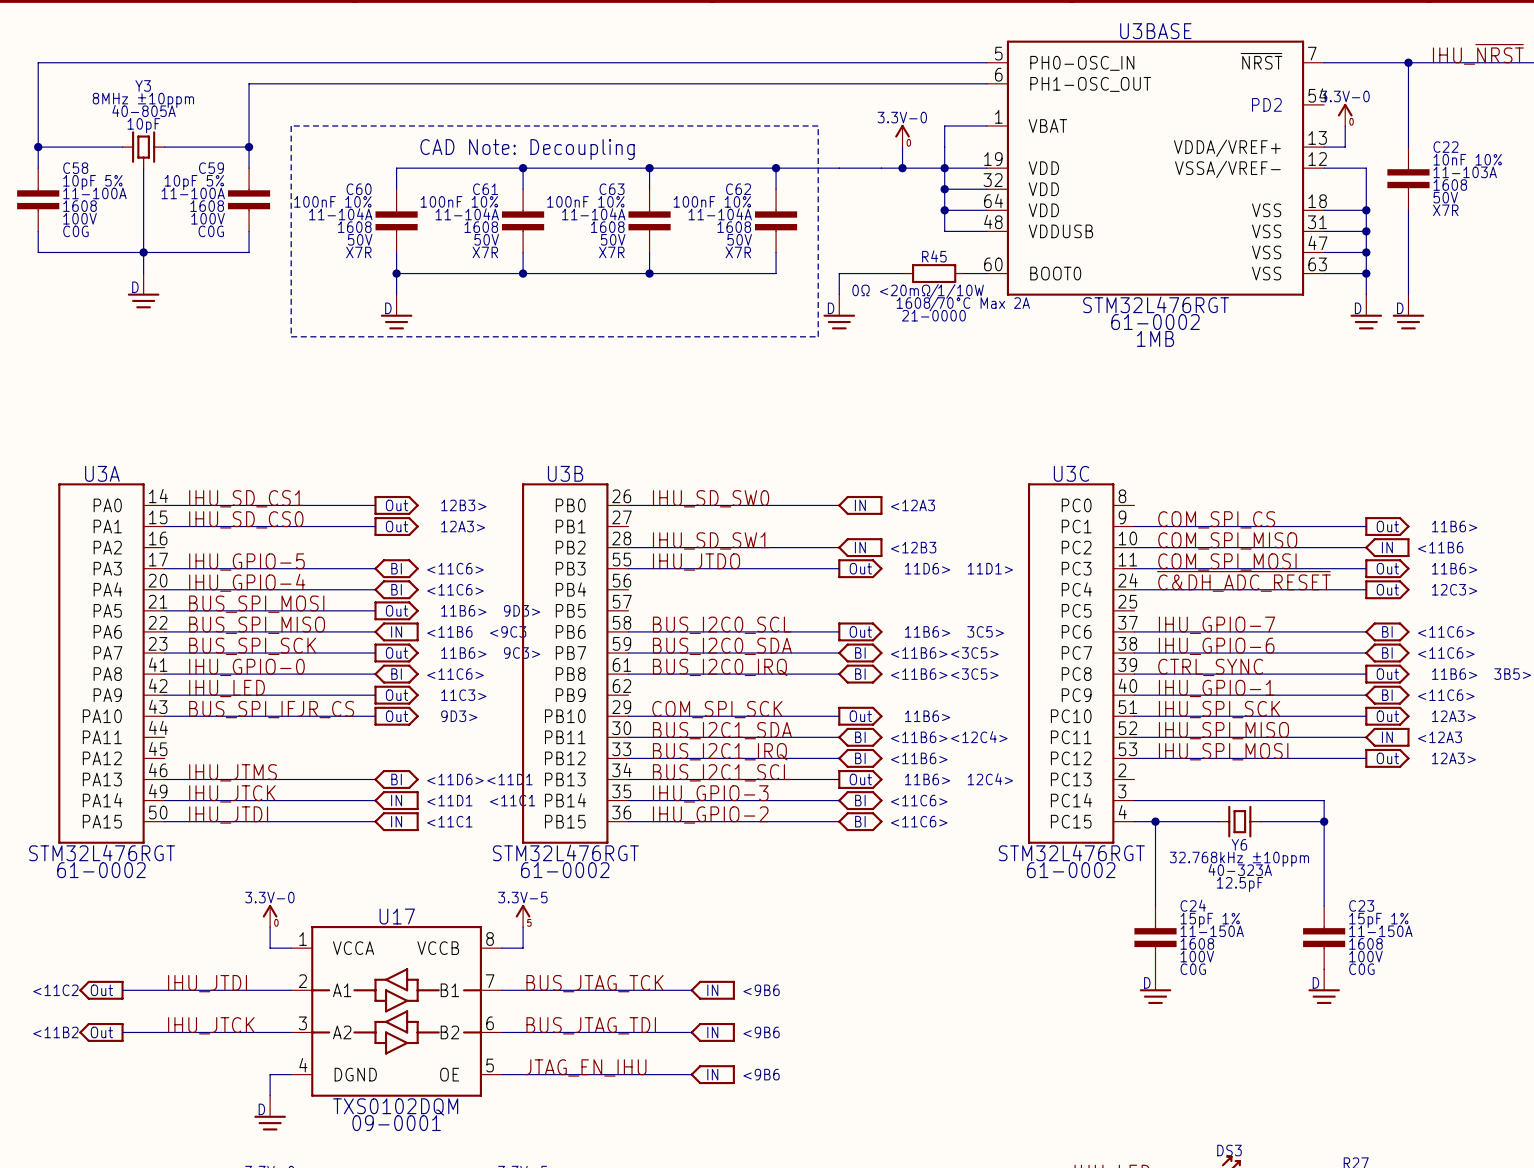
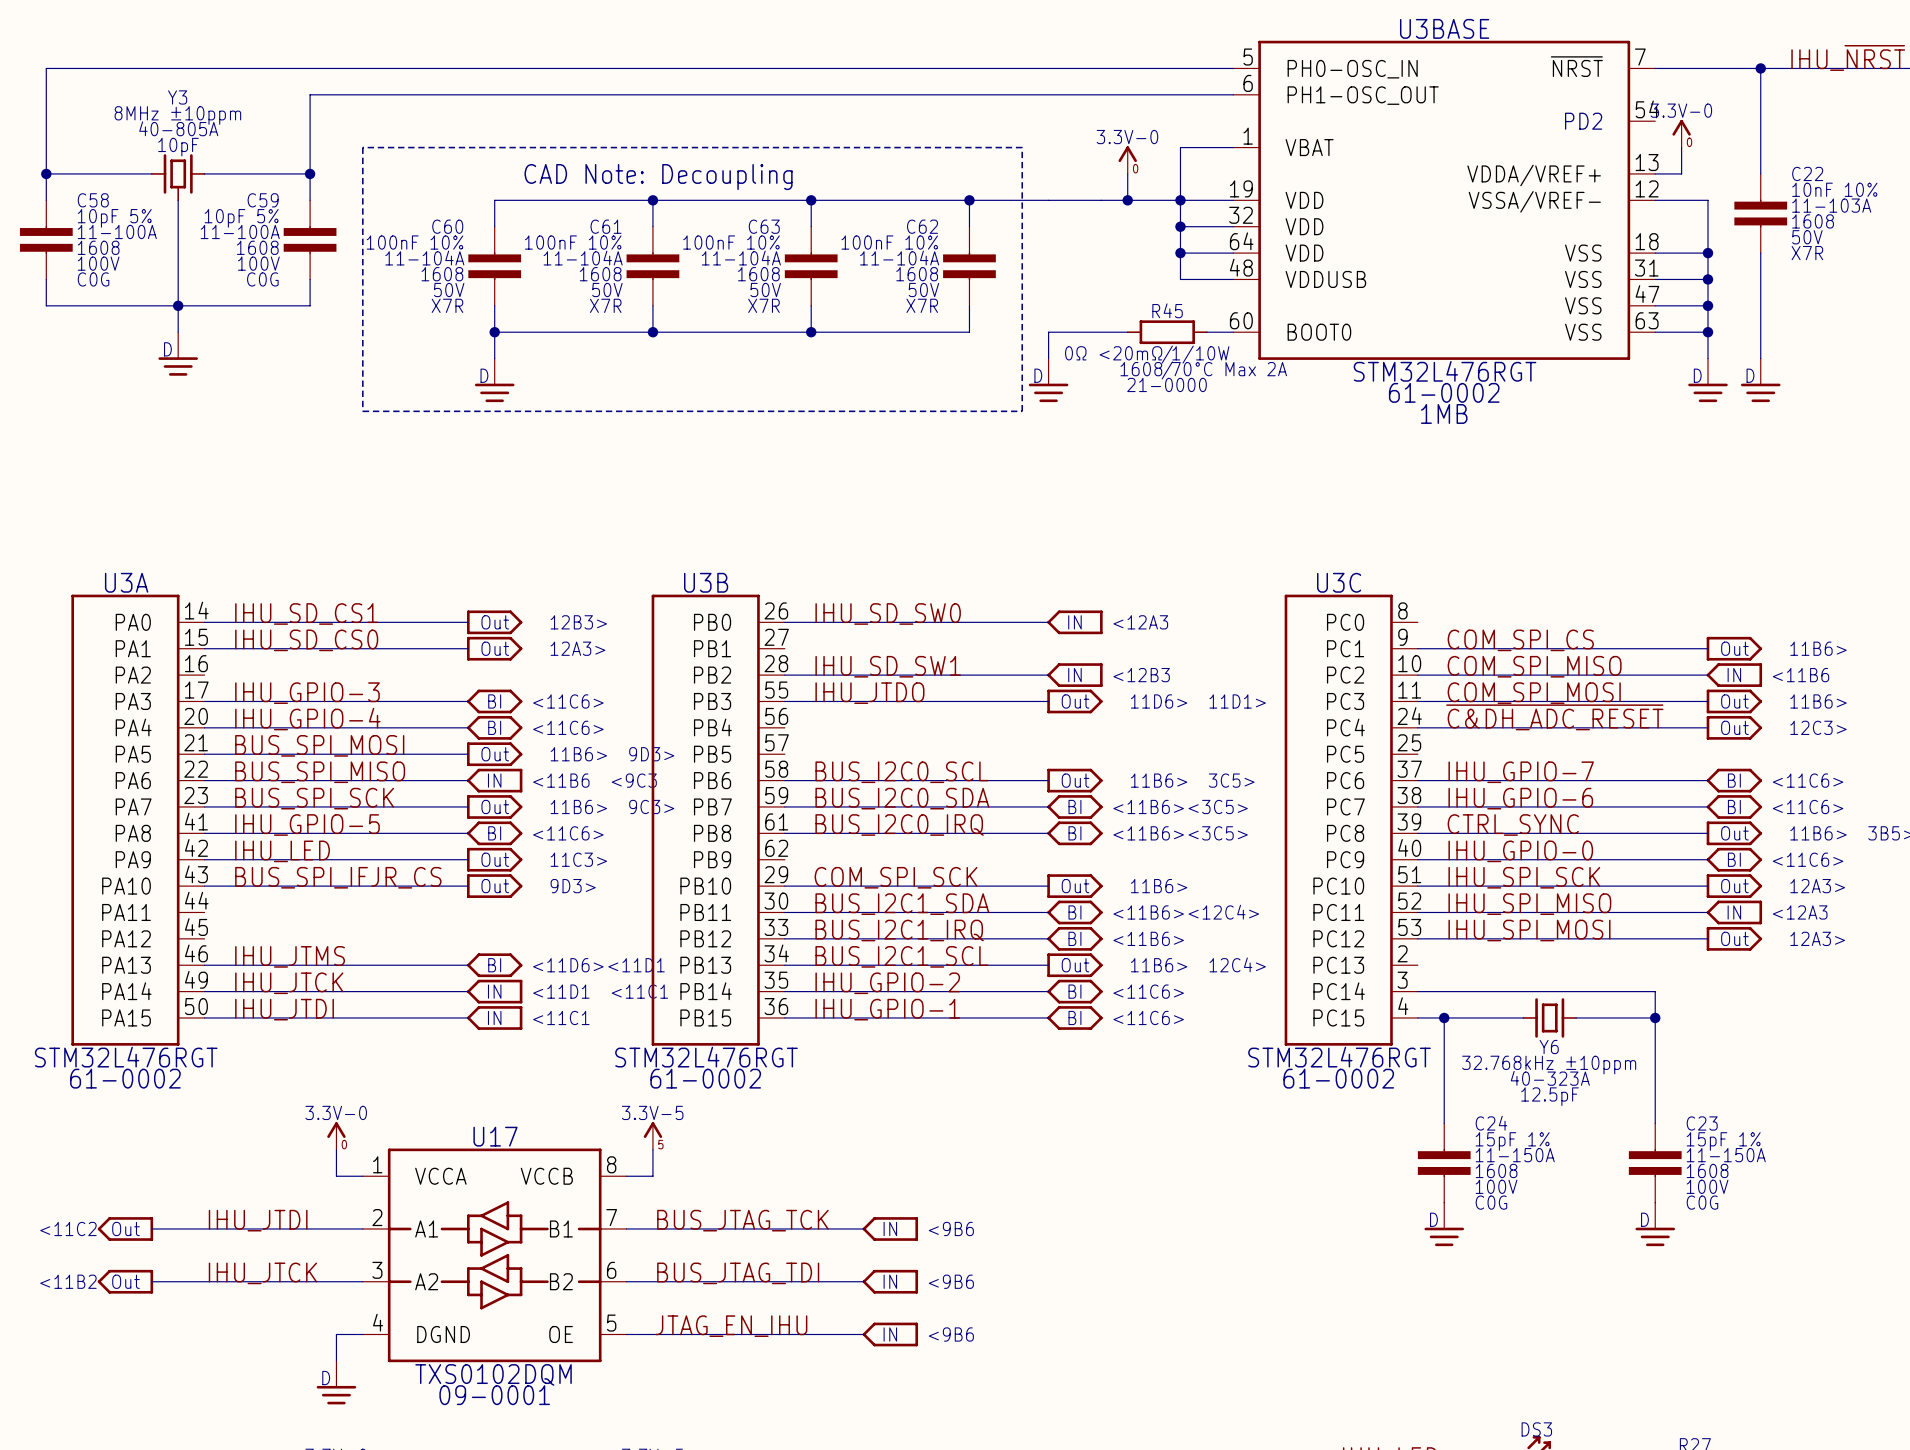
label: IHU_GPIO-5 (246, 562) -> IHU_GPIO-3 (307, 693)
label: IHU_GPIO-0 (246, 667) -> IHU_GPIO-5 (307, 825)
label: IHU_GPIO-1 (1216, 688) -> IHU_GPIO-0 (1520, 851)
label: IHU_GPIO-3 (710, 793) -> IHU_GPIO-2 (887, 983)
label: IHU_GPIO-2 (710, 814) -> IHU_GPIO-1 (887, 1009)

